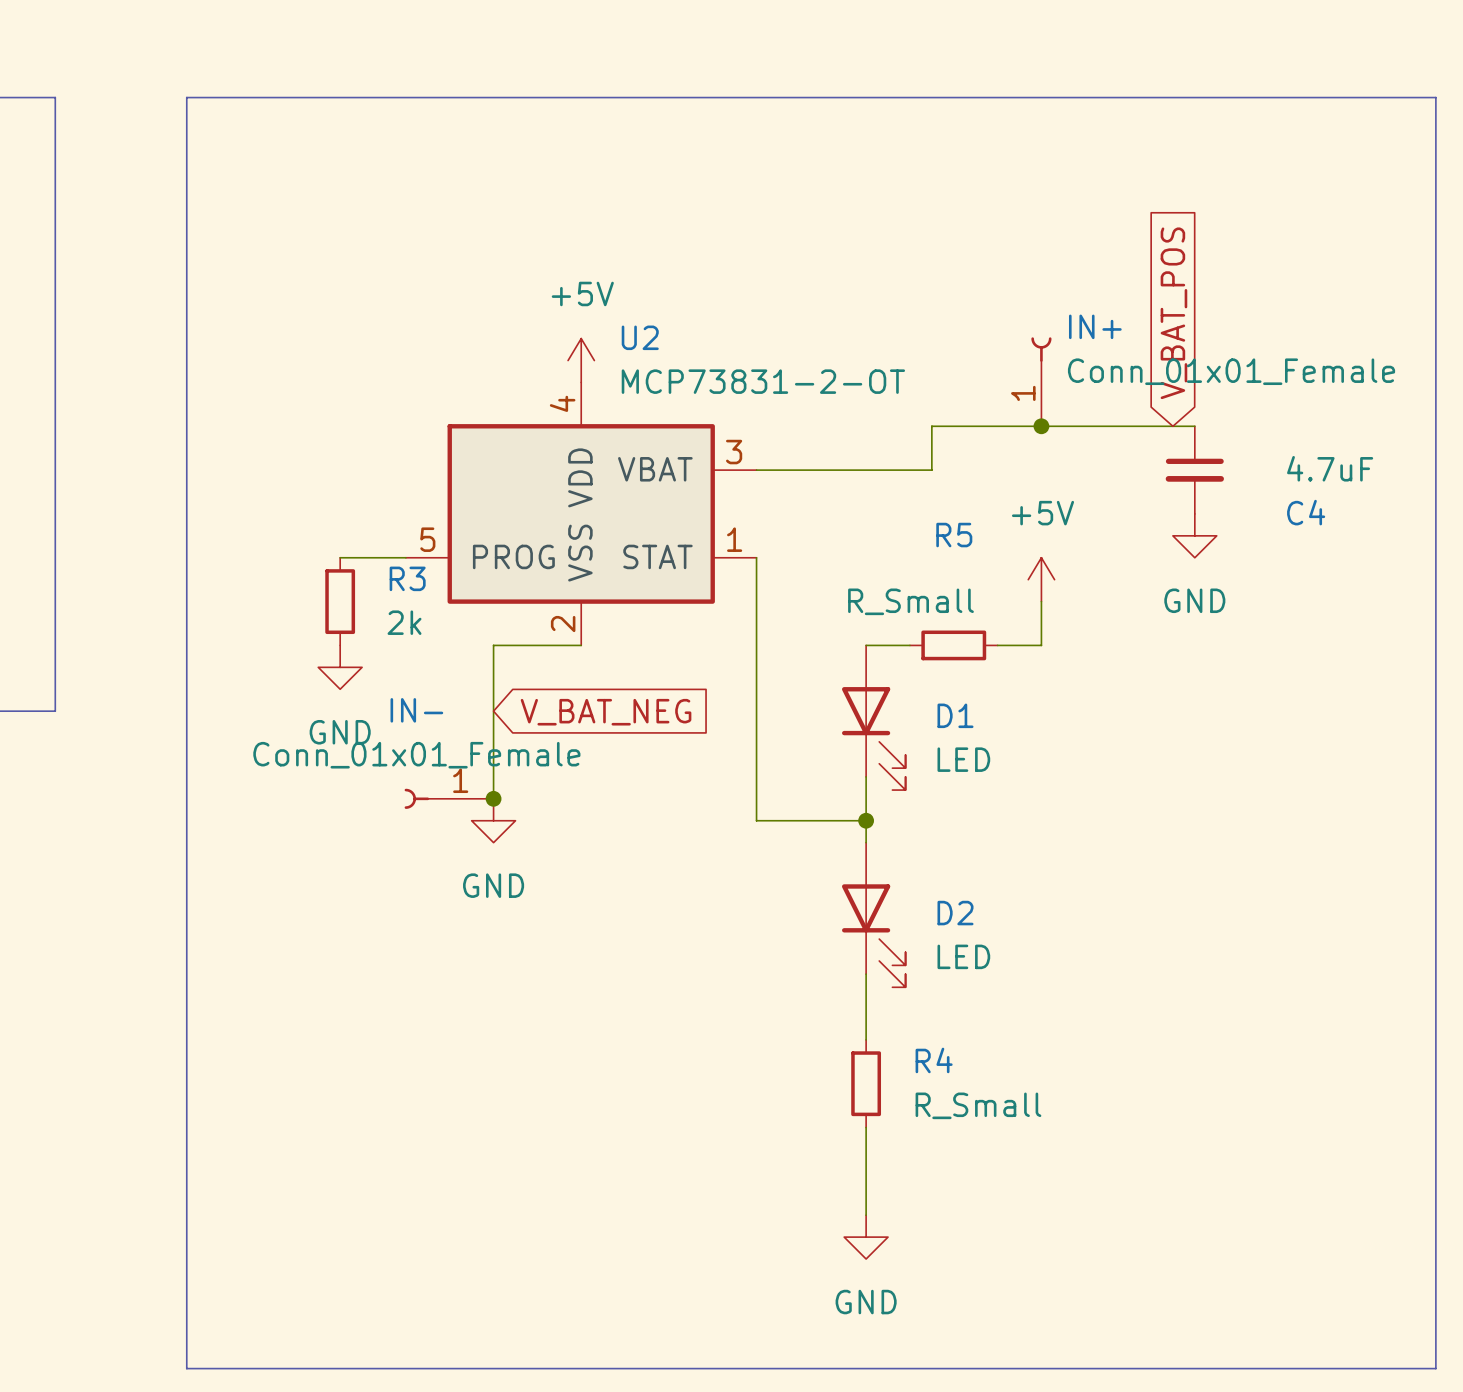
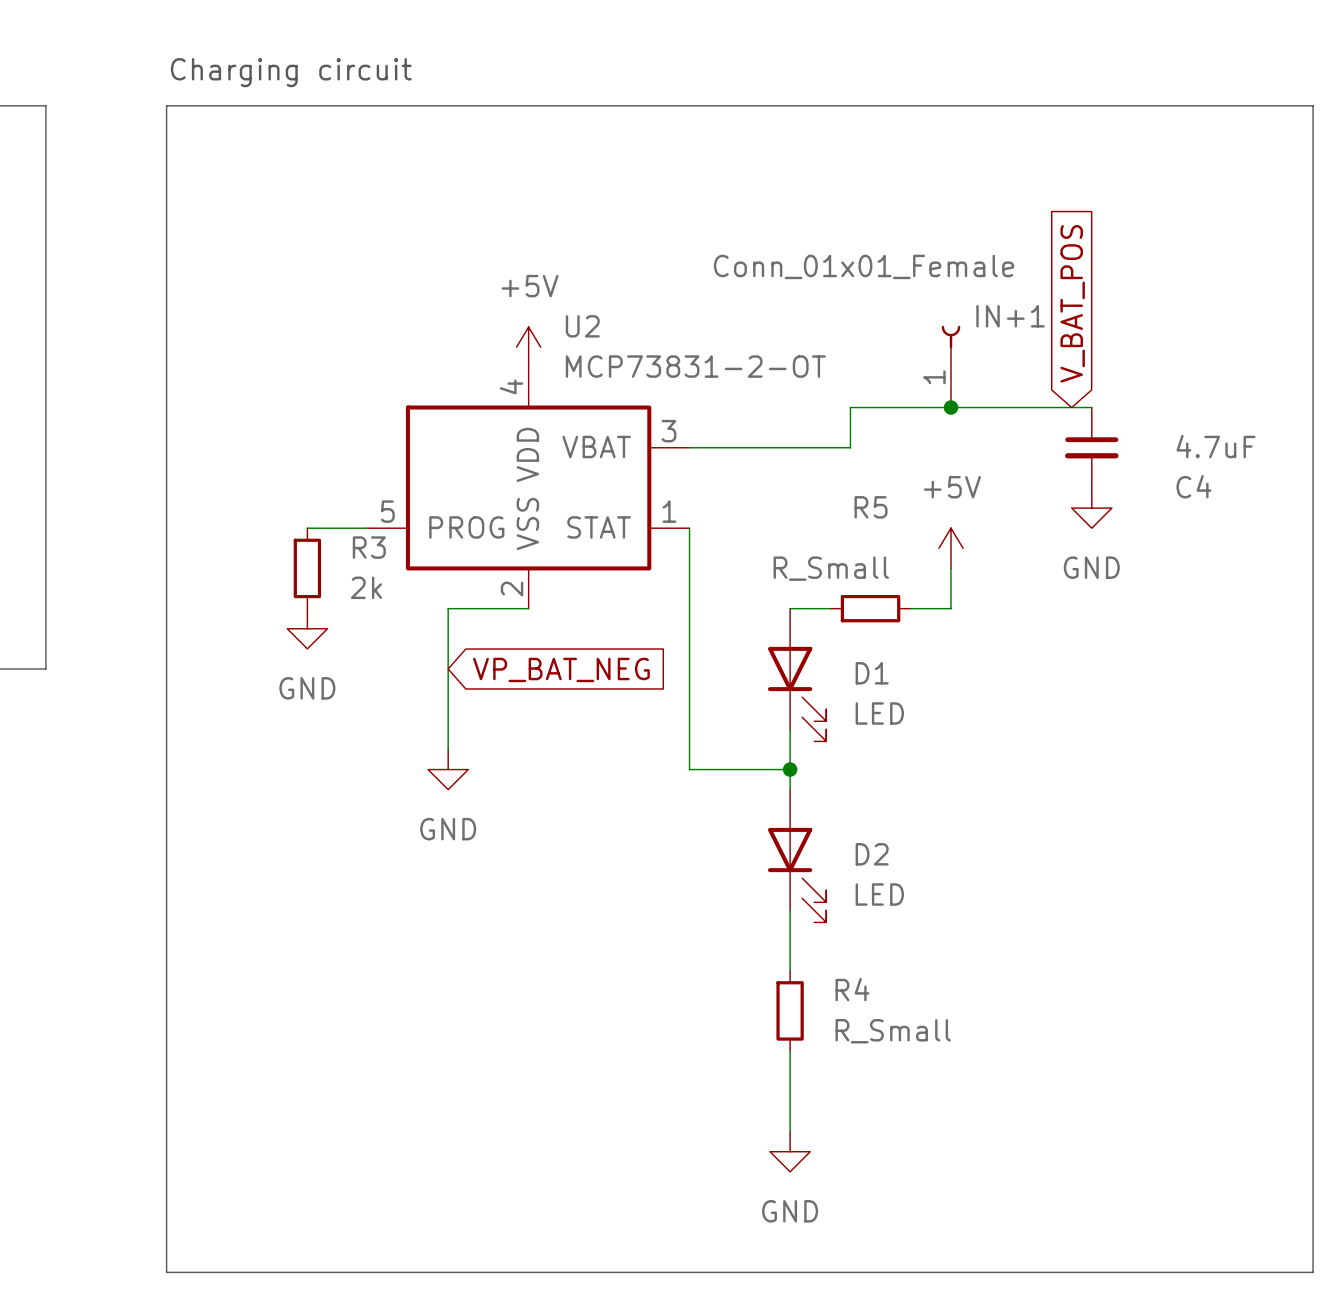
text: none -> Charging circuit (291, 72)
IN+ name: IN+ (1095, 326) -> IN+1 (1010, 316)
IN+ value position: Conn_01x01_Female (1231, 371) -> Conn_01x01_Female (864, 266)
global label: V_BAT_NEG (606, 712) -> VP_BAT_NEG (561, 669)
IN-: Conn_01x01_Female (449, 798) -> none
junction: (493, 798) -> none

